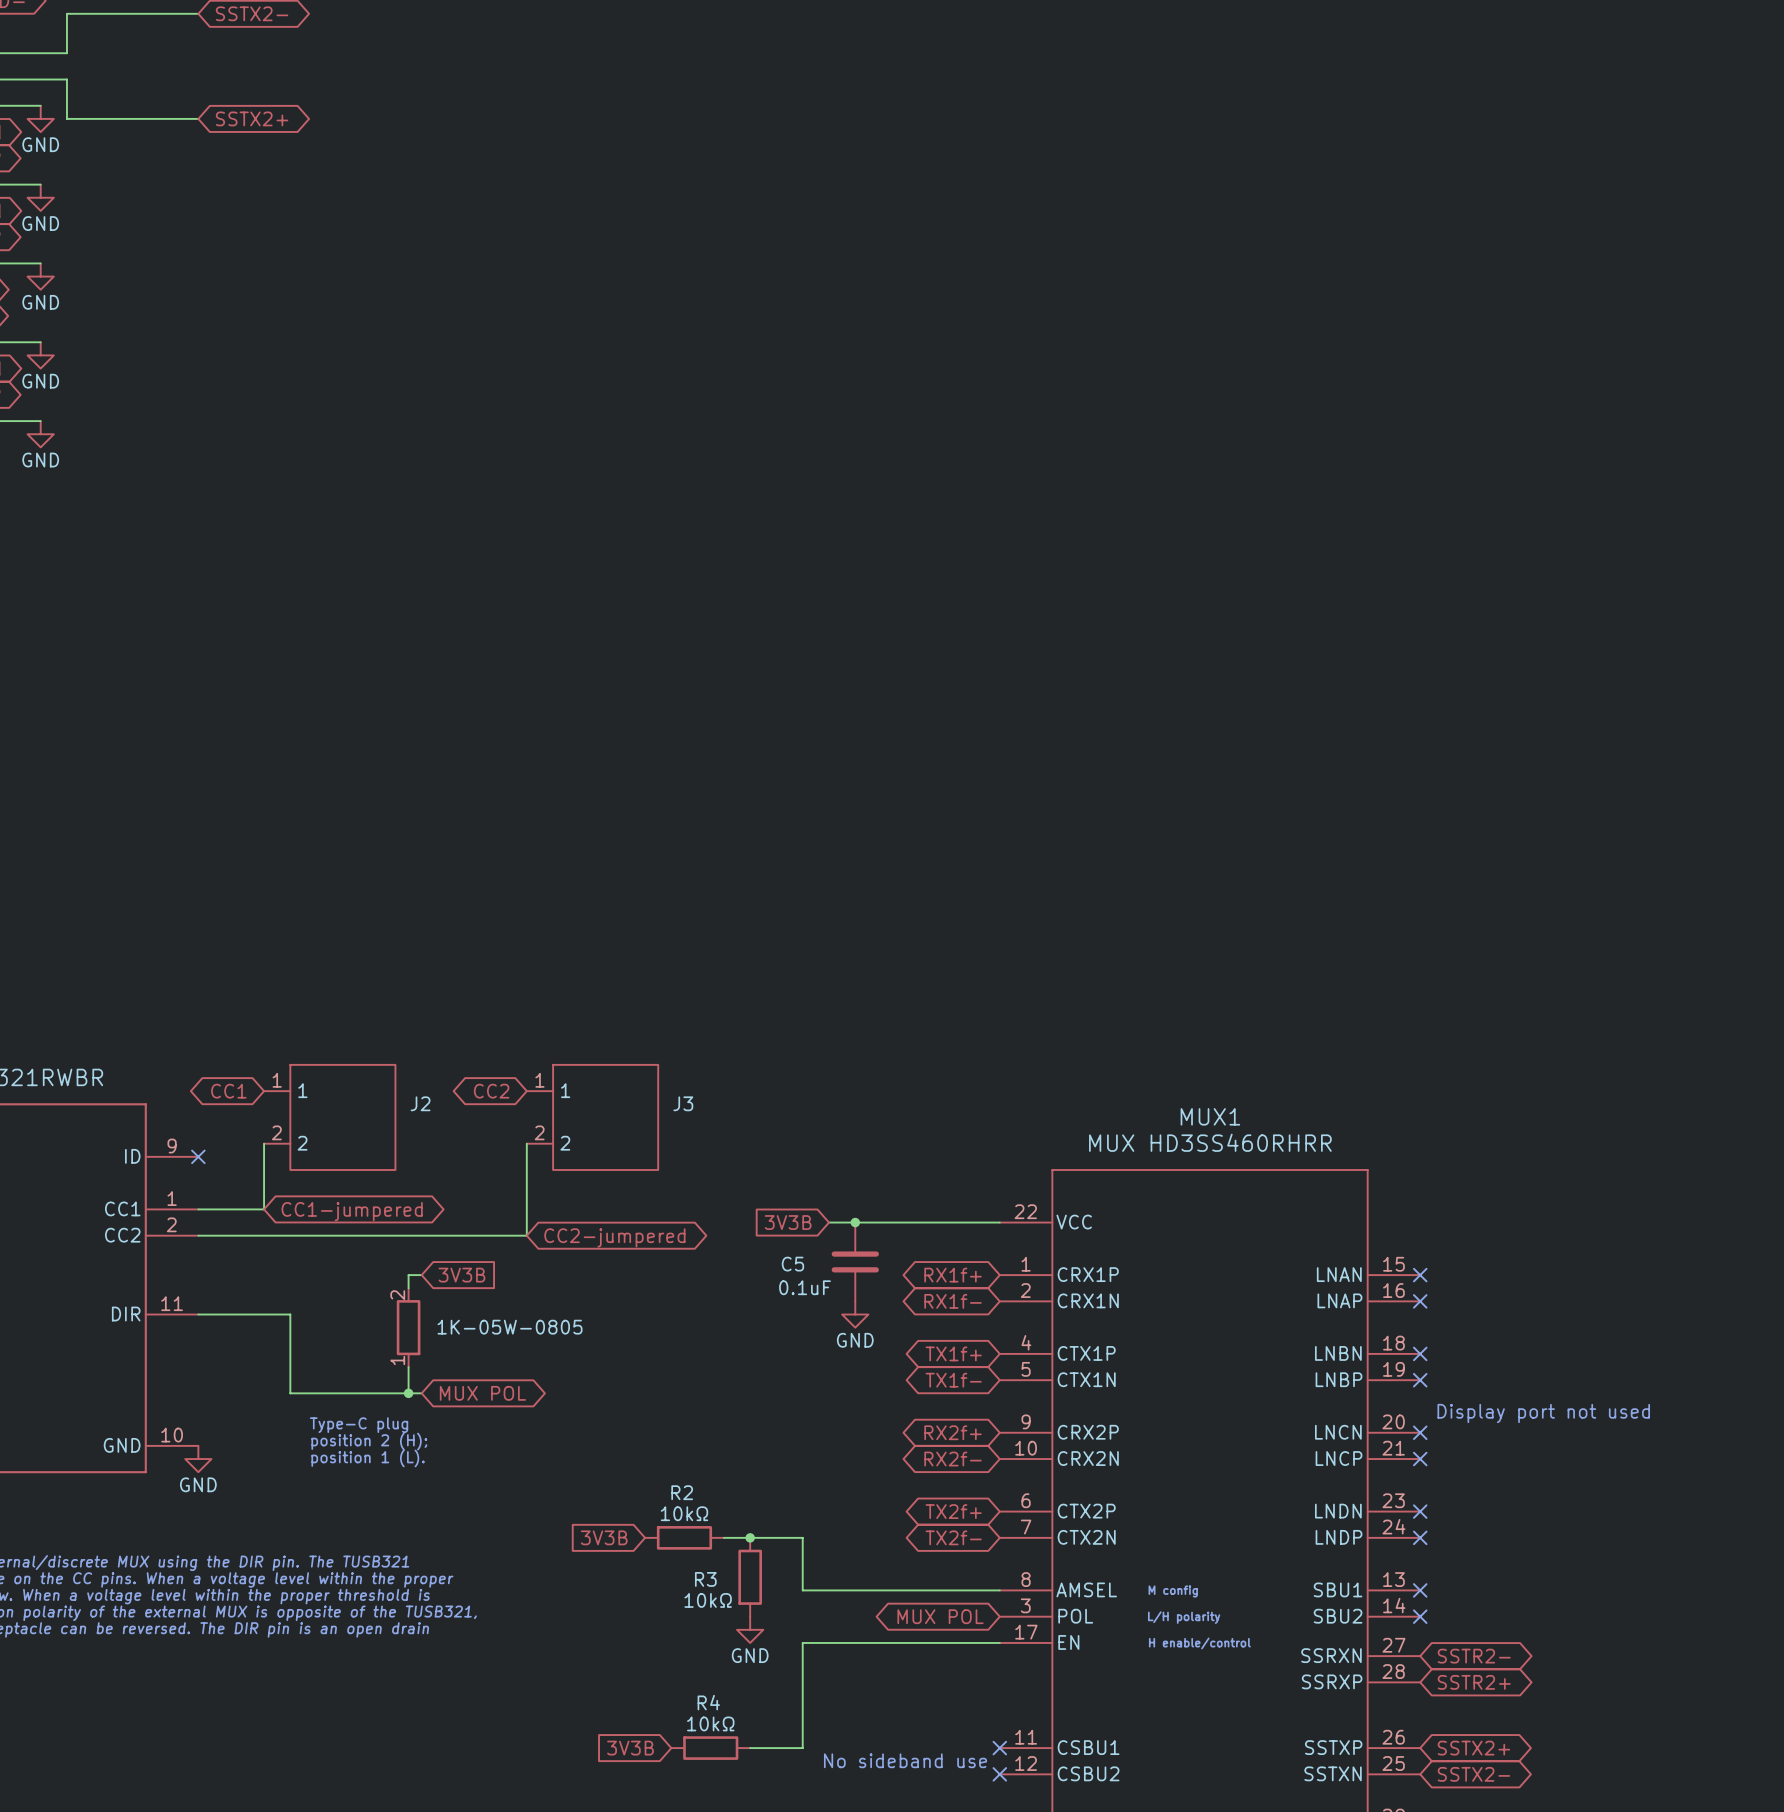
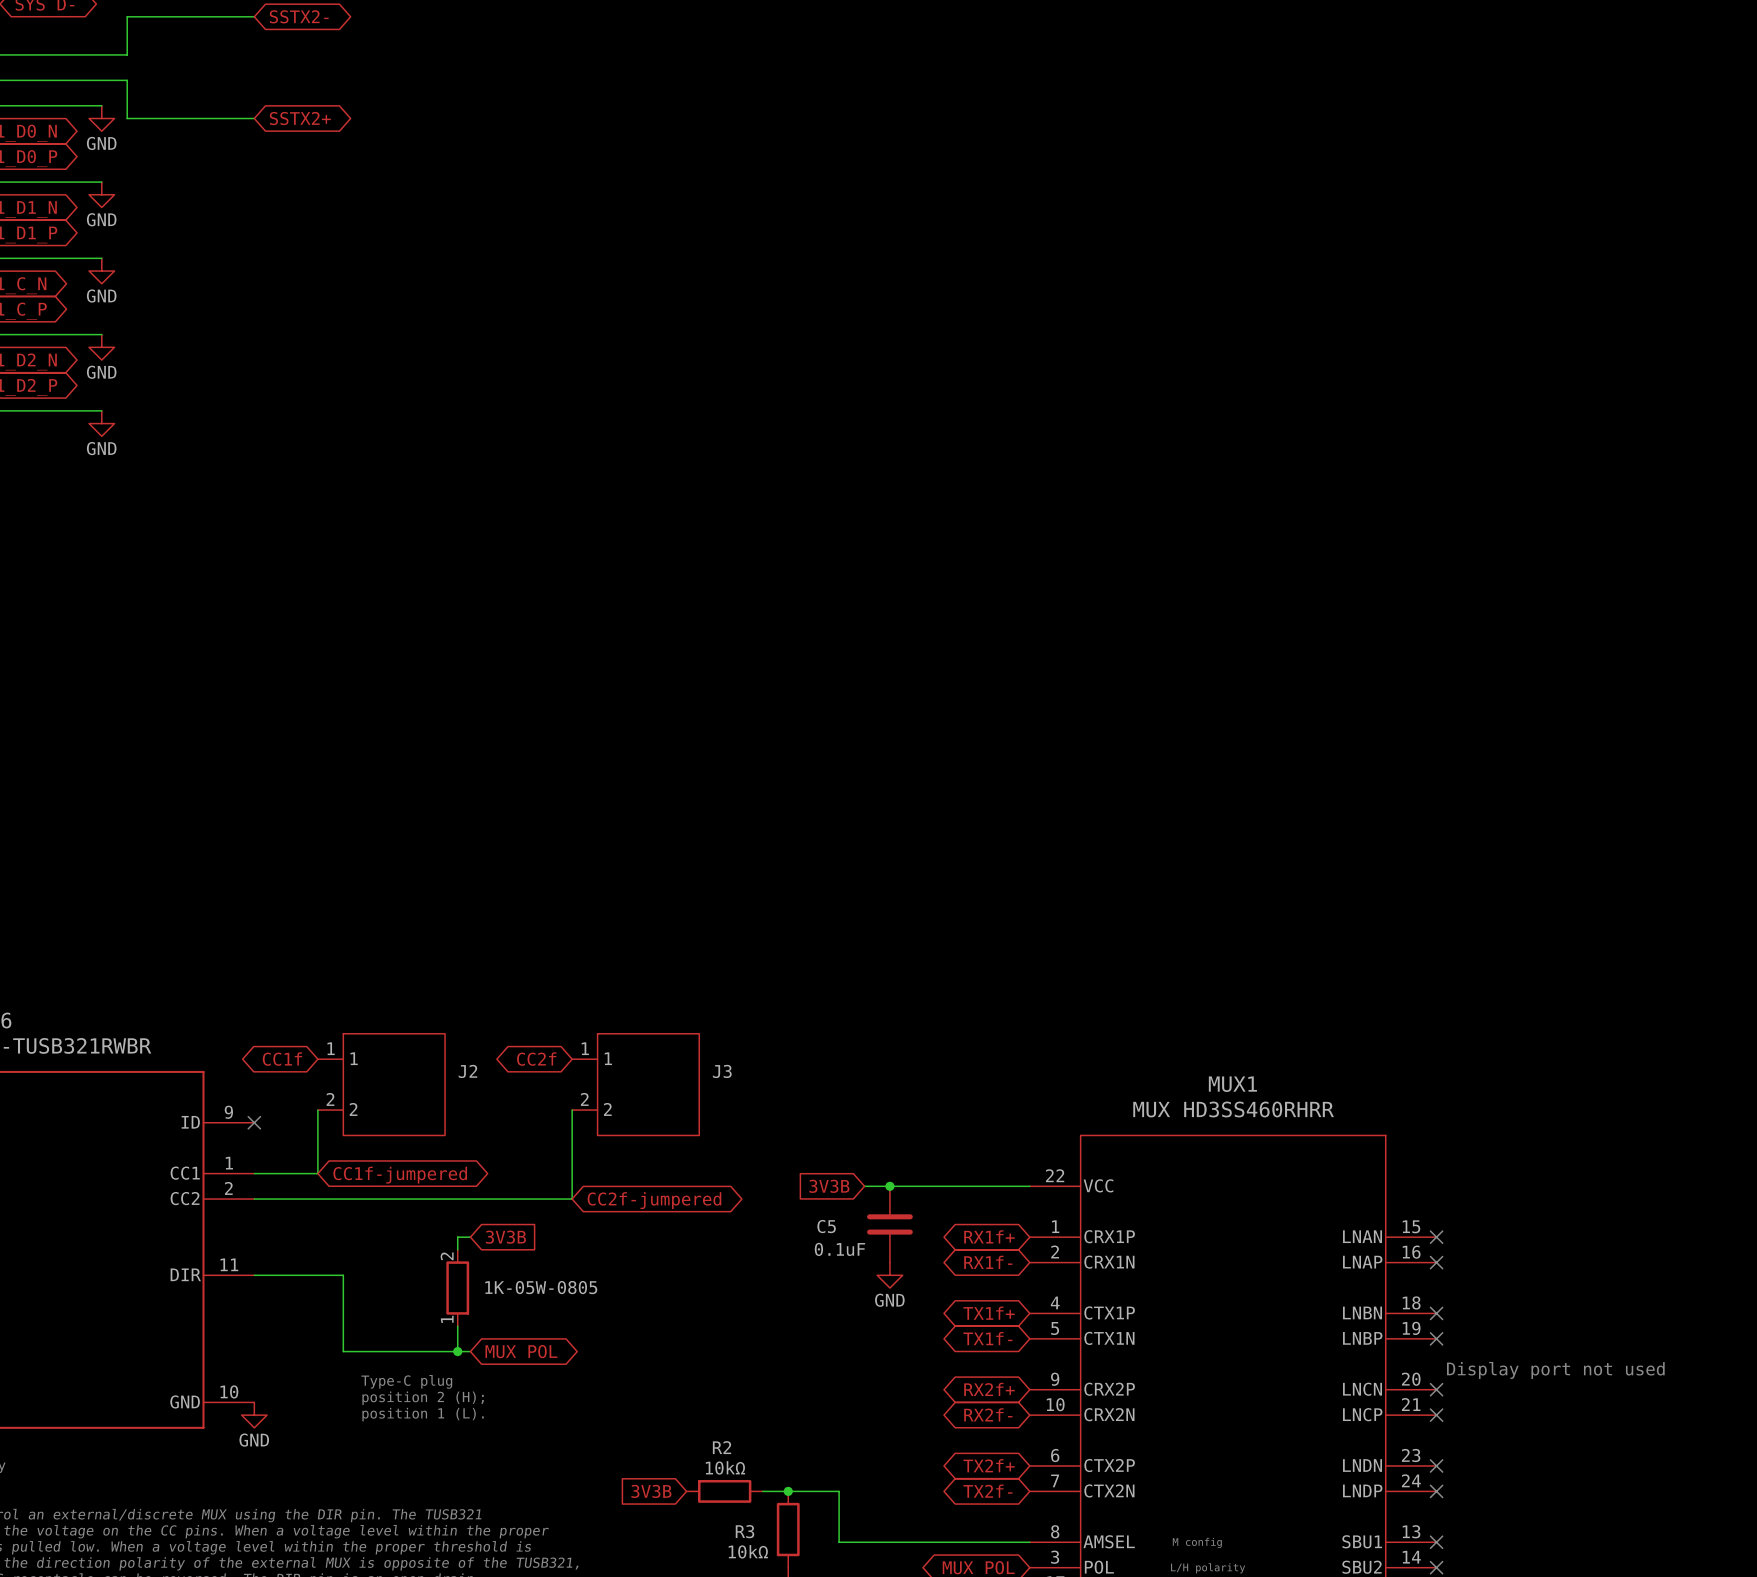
global label: CC1 (228, 1091) -> CC1f (282, 1059)
global label: CC2 (491, 1091) -> CC2f (536, 1059)
global label: CC1-jumpered (352, 1211) -> CC1f-jumpered (400, 1175)
global label: CC2-jumpered (614, 1237) -> CC2f-jumpered (654, 1200)

